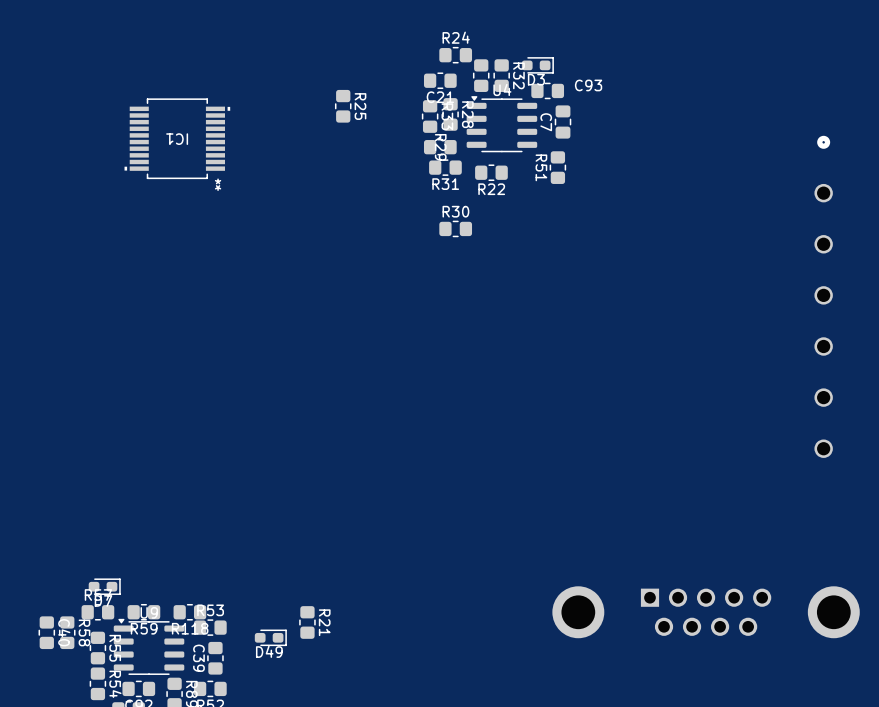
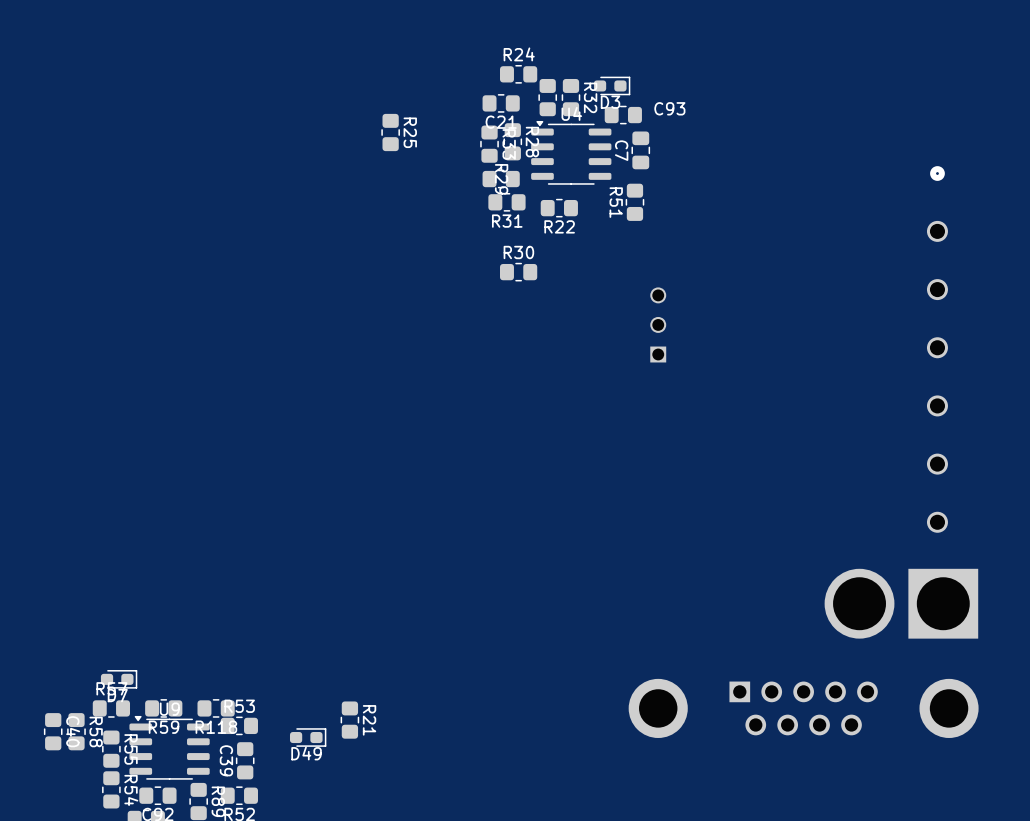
IC1: (177, 138) -> none
part: none -> (658, 324)
part: none -> (901, 603)

